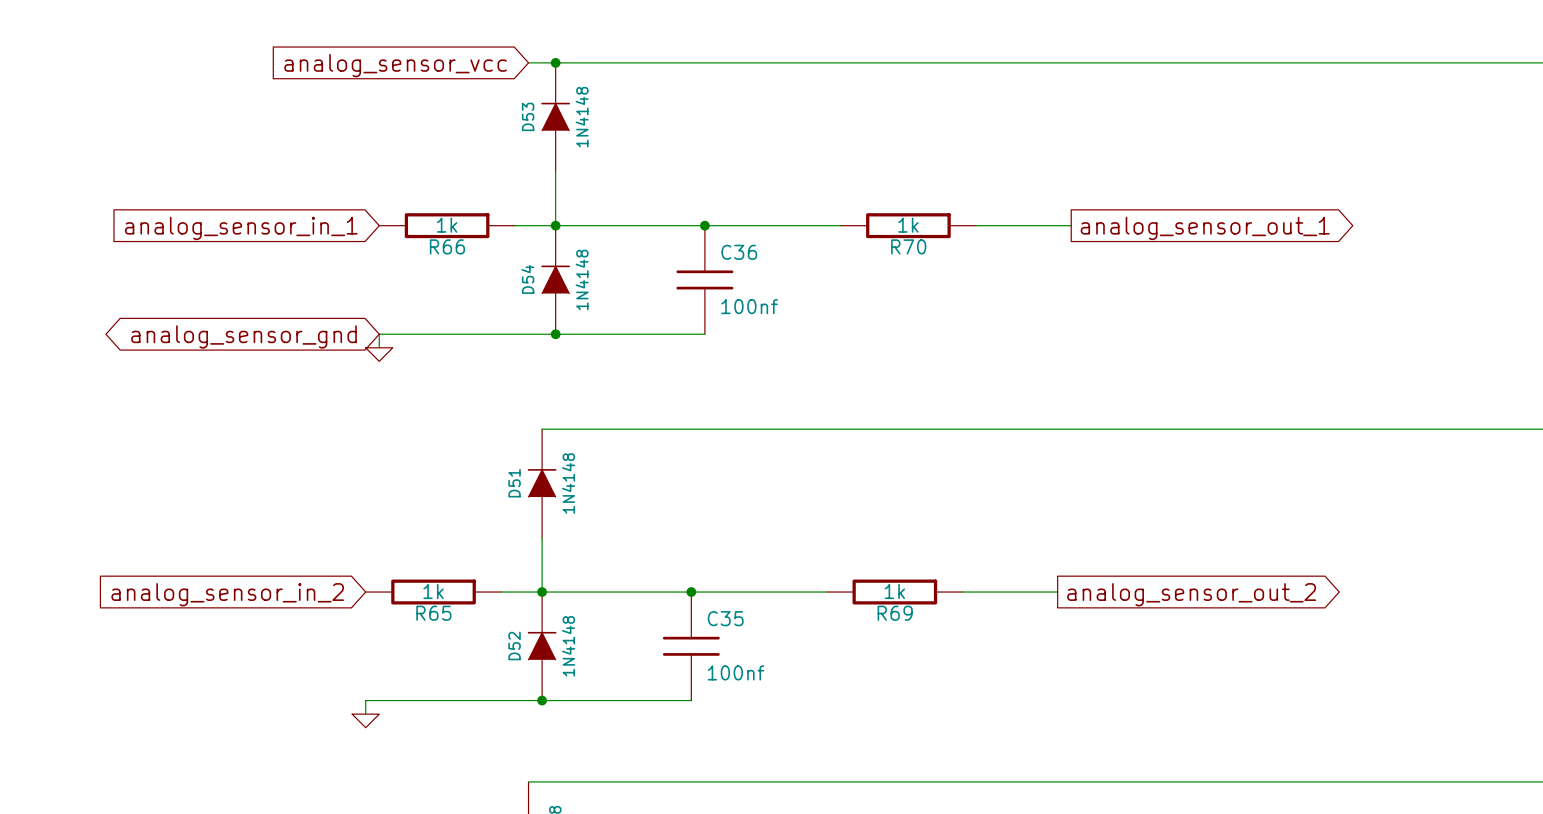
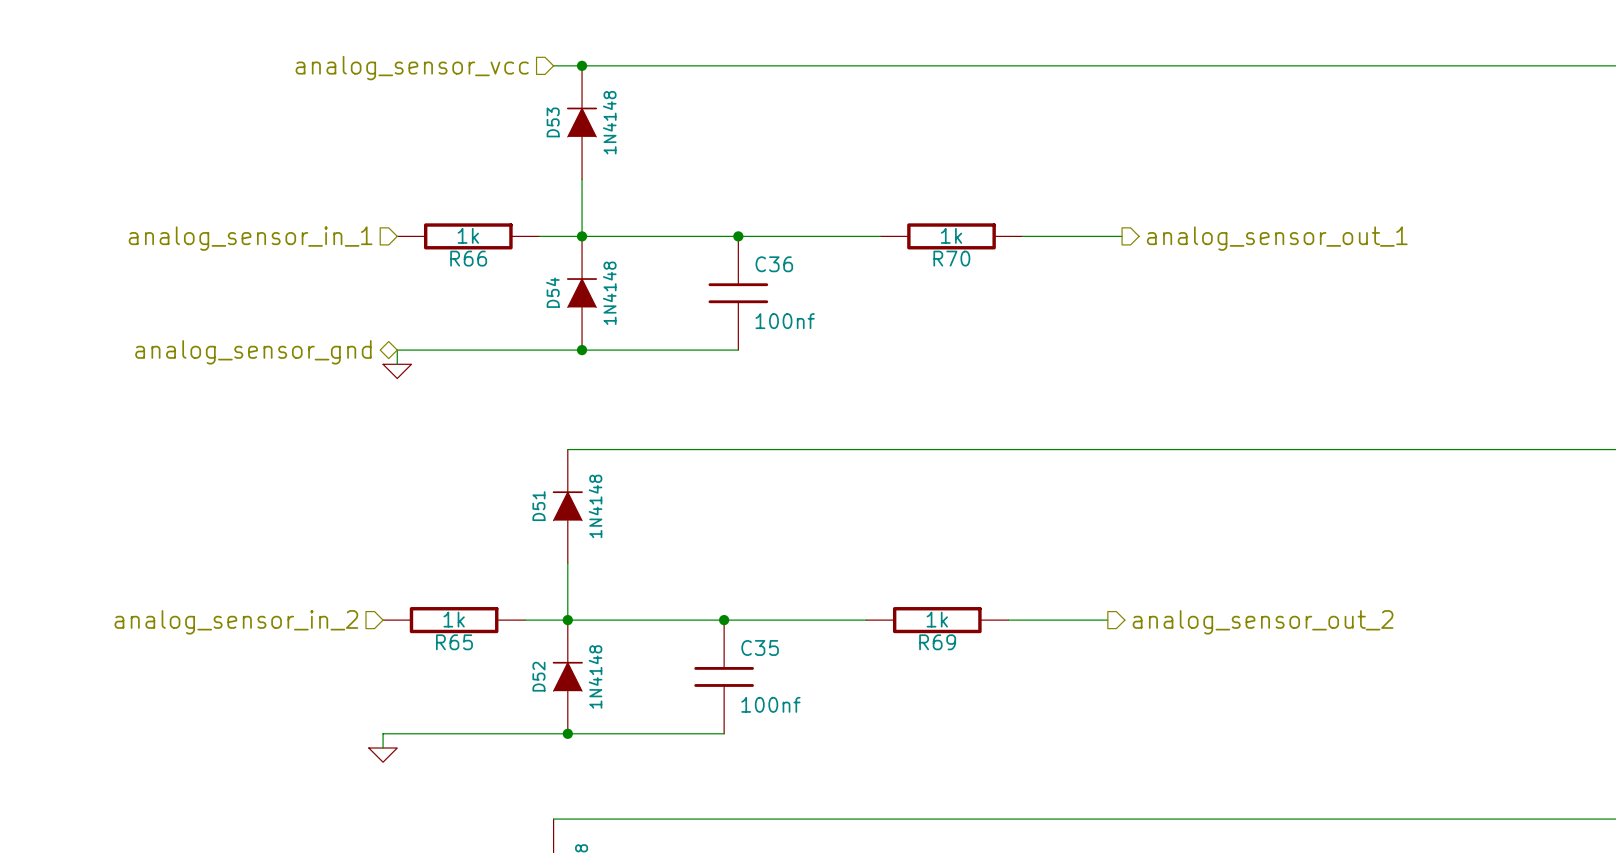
hierarchical label: none -> analog_sensor_vcc (412, 68)
global label: analog_sensor_vcc (395, 65) -> none
hierarchical label: none -> analog_sensor_in_1 (250, 238)
hierarchical label: none -> analog_sensor_out_1 (1277, 238)
global label: analog_sensor_in_1 (241, 228) -> none
global label: analog_sensor_out_1 (1205, 228) -> none
hierarchical label: none -> analog_sensor_gnd (253, 352)
global label: analog_sensor_gnd (243, 336) -> none
hierarchical label: none -> analog_sensor_in_2 (236, 622)
global label: analog_sensor_in_2 (227, 594) -> none
global label: analog_sensor_out_2 (1191, 594) -> none
hierarchical label: none -> analog_sensor_out_2 (1263, 622)

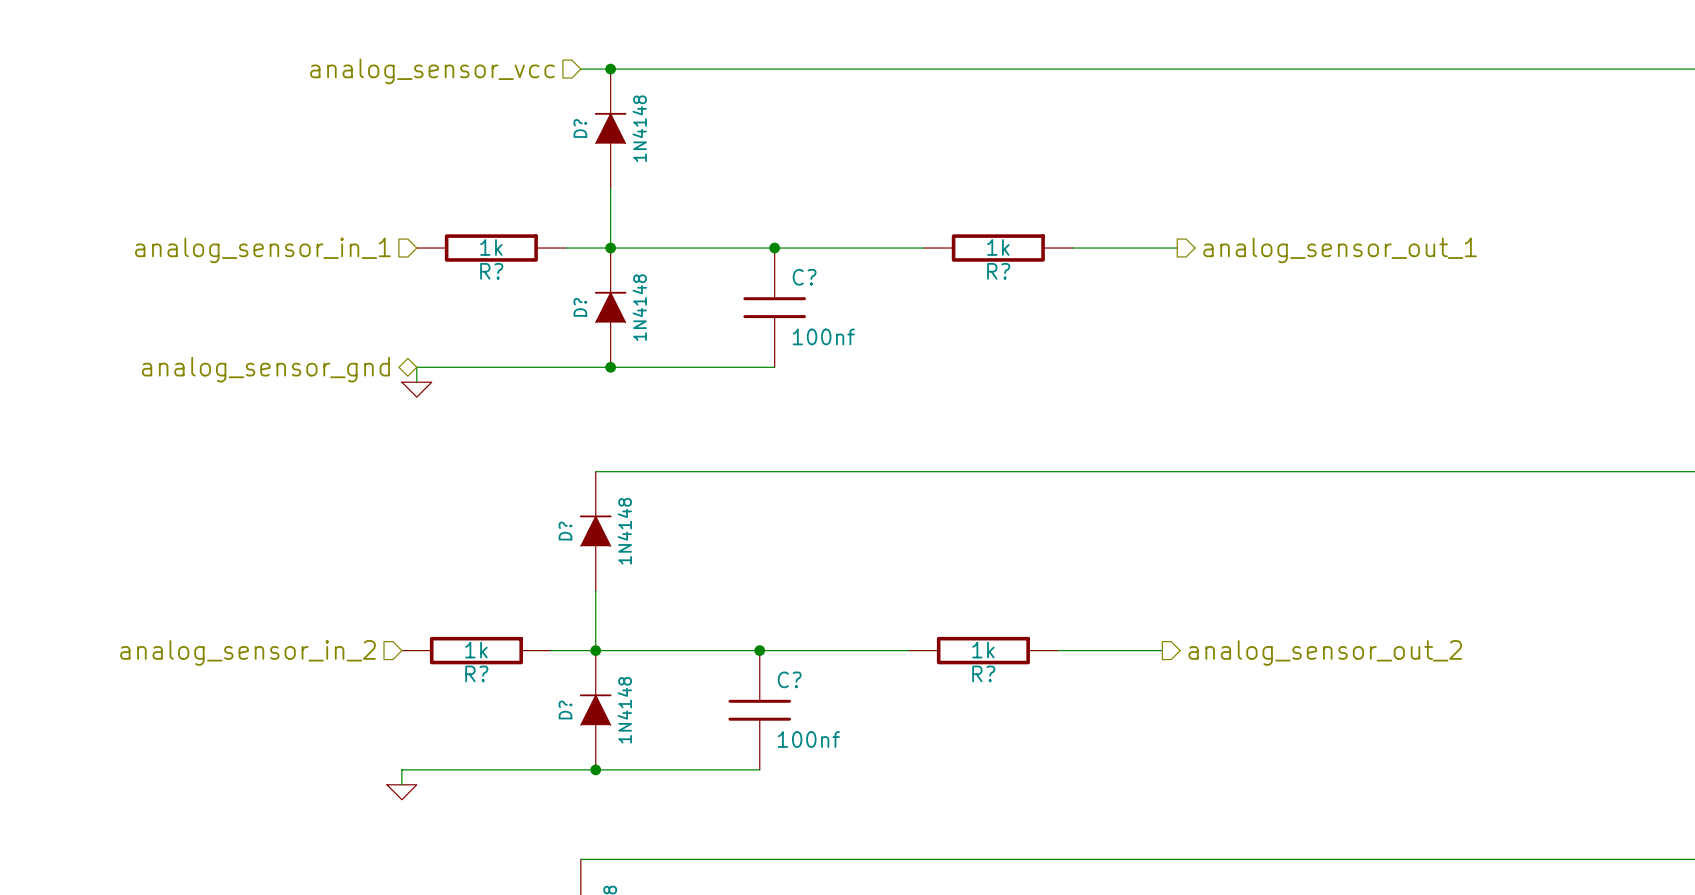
D53 name: D53 (553, 122) -> D? (580, 128)
R66 name: R66 (468, 258) -> R? (491, 271)
R70 name: R70 (951, 258) -> R? (998, 271)
C36 name: C36 (774, 264) -> C? (804, 277)
D54 name: D54 (552, 292) -> D? (580, 307)
D51 name: D51 (538, 506) -> D? (565, 531)
R65 name: R65 (454, 642) -> R? (476, 673)
R69 name: R69 (937, 642) -> R? (983, 673)
C35 name: C35 (760, 647) -> C? (789, 679)
D52 name: D52 (538, 676) -> D? (565, 709)

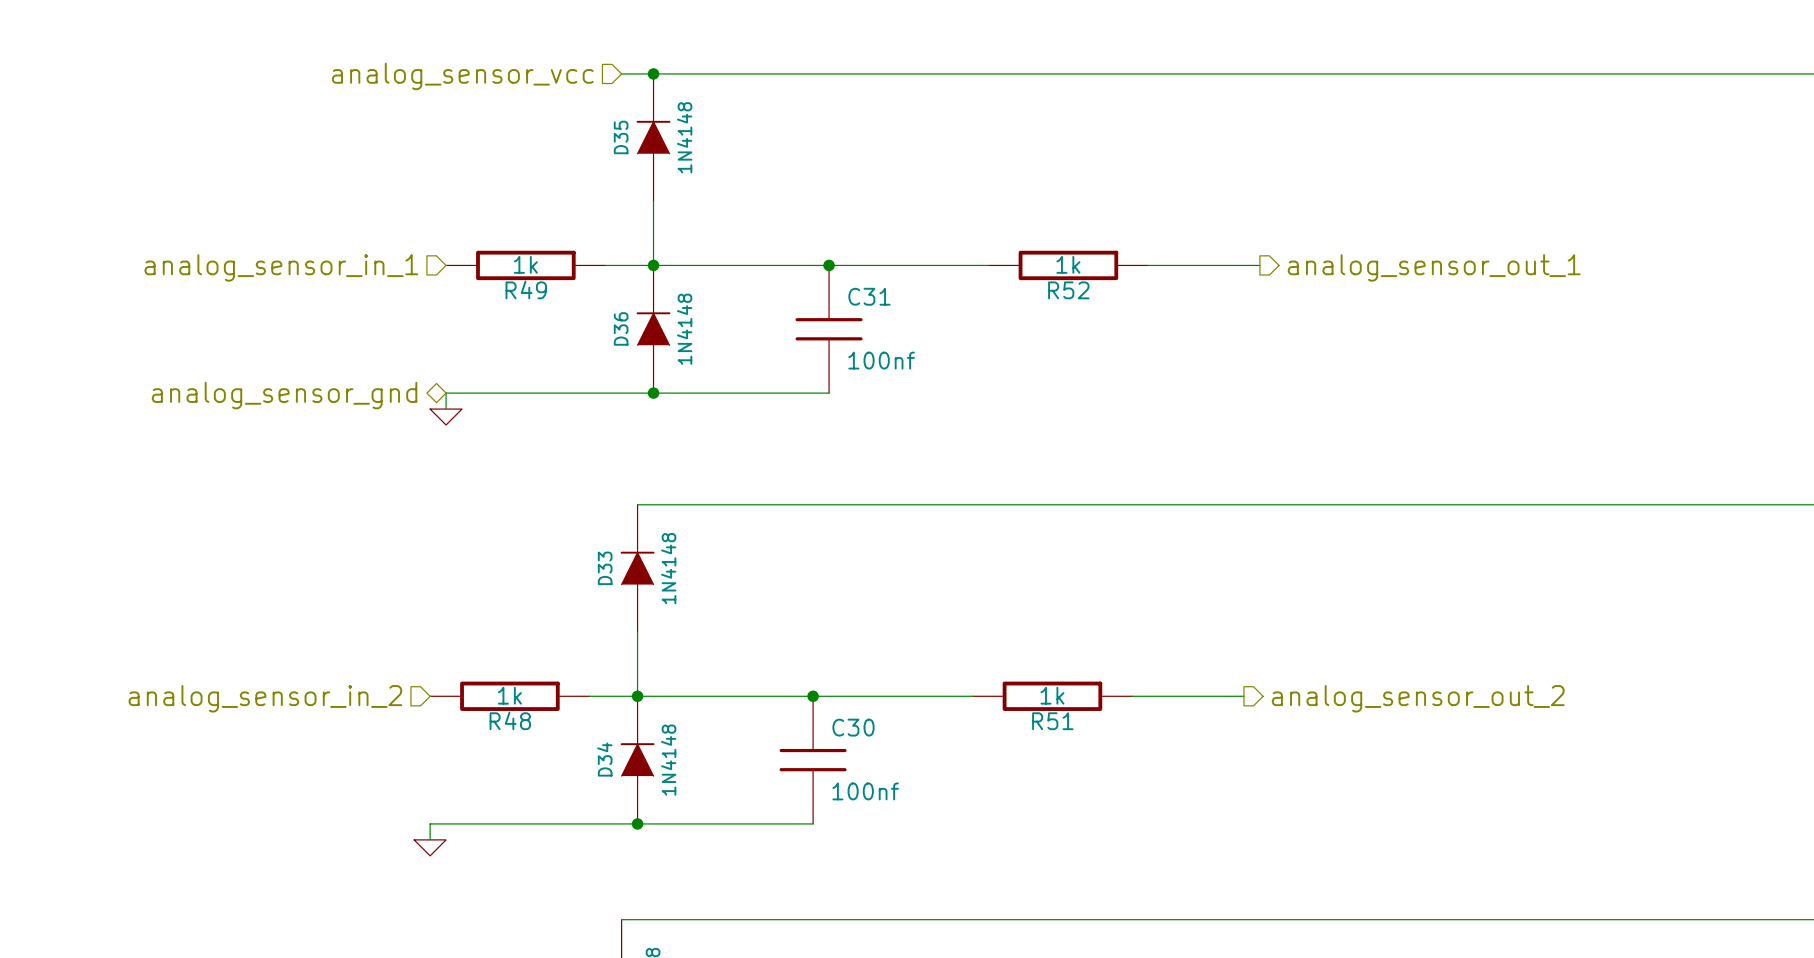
D? name: D? (580, 128) -> D35 (621, 137)
R? name: R? (491, 271) -> R49 (526, 289)
R? name: R? (998, 271) -> R52 (1068, 290)
C? name: C? (804, 277) -> C31 (869, 296)
D? name: D? (580, 307) -> D36 (621, 328)
D? name: D? (565, 531) -> D33 (605, 568)
R? name: R? (476, 673) -> R48 (510, 720)
R? name: R? (983, 673) -> R51 (1052, 721)
C? name: C? (789, 679) -> C30 (853, 727)
D? name: D? (565, 709) -> D34 (604, 759)

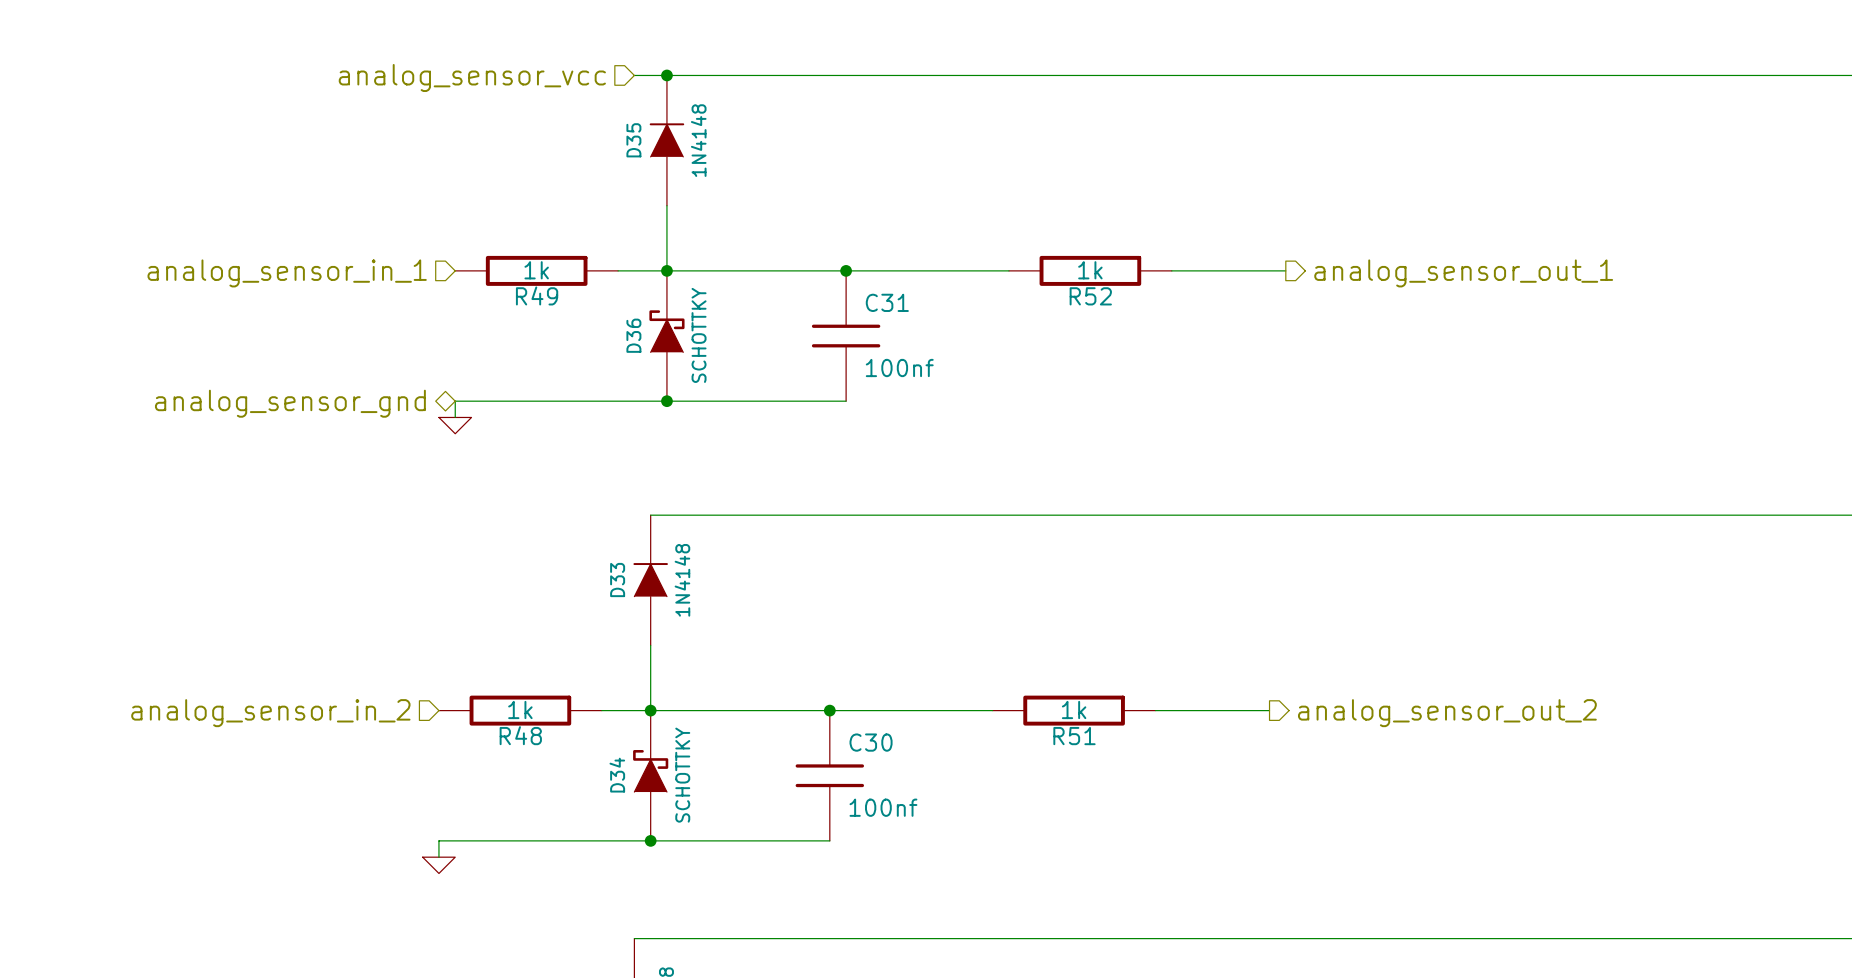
D36 symbol: [636, 265, 671, 394] -> [649, 270, 685, 402]
D36 value: 1N4148 (684, 329) -> SCHOTTKY (699, 335)
D34 symbol: [620, 696, 655, 824] -> [633, 710, 669, 841]
D34 value: 1N4148 (668, 760) -> SCHOTTKY (682, 775)

